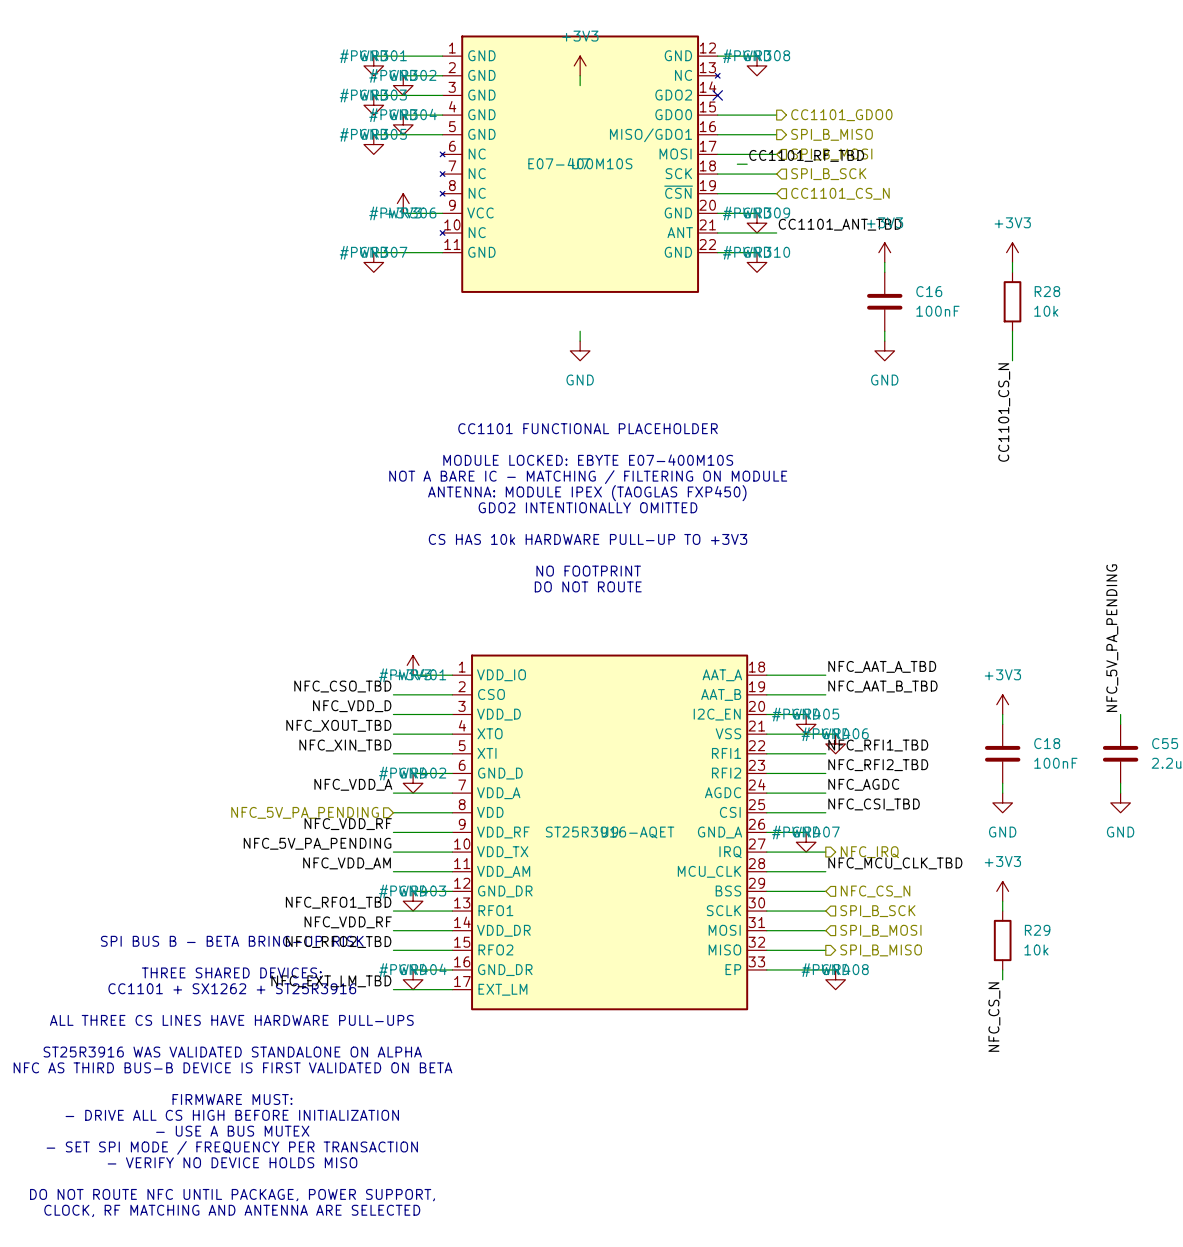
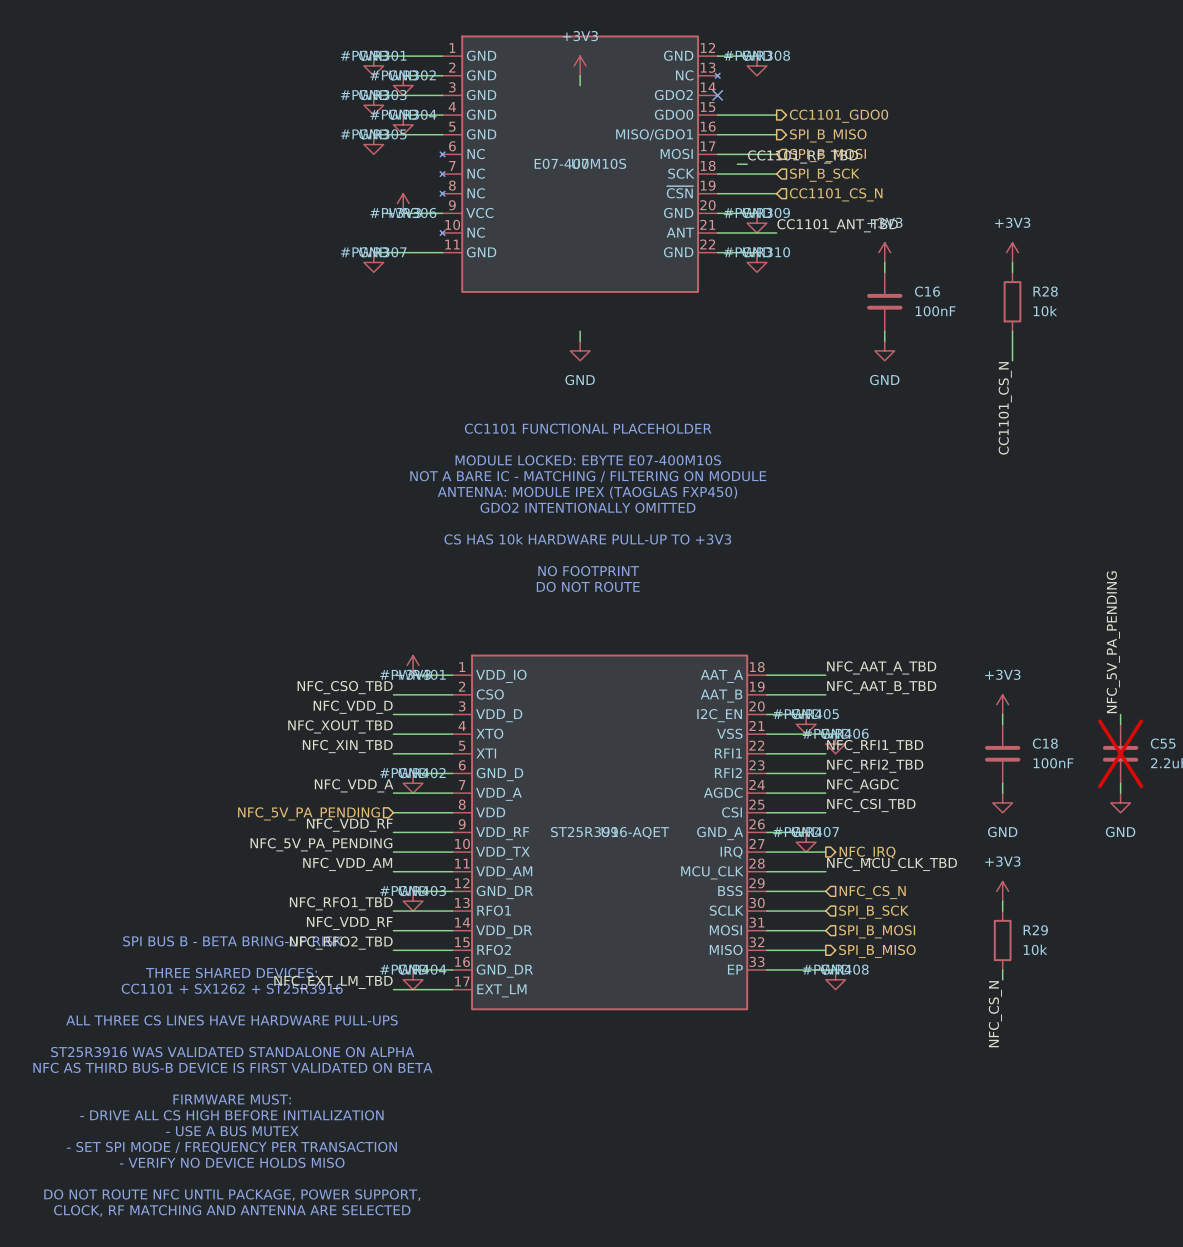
C55 do-not-place cross: none -> (1120, 753)

